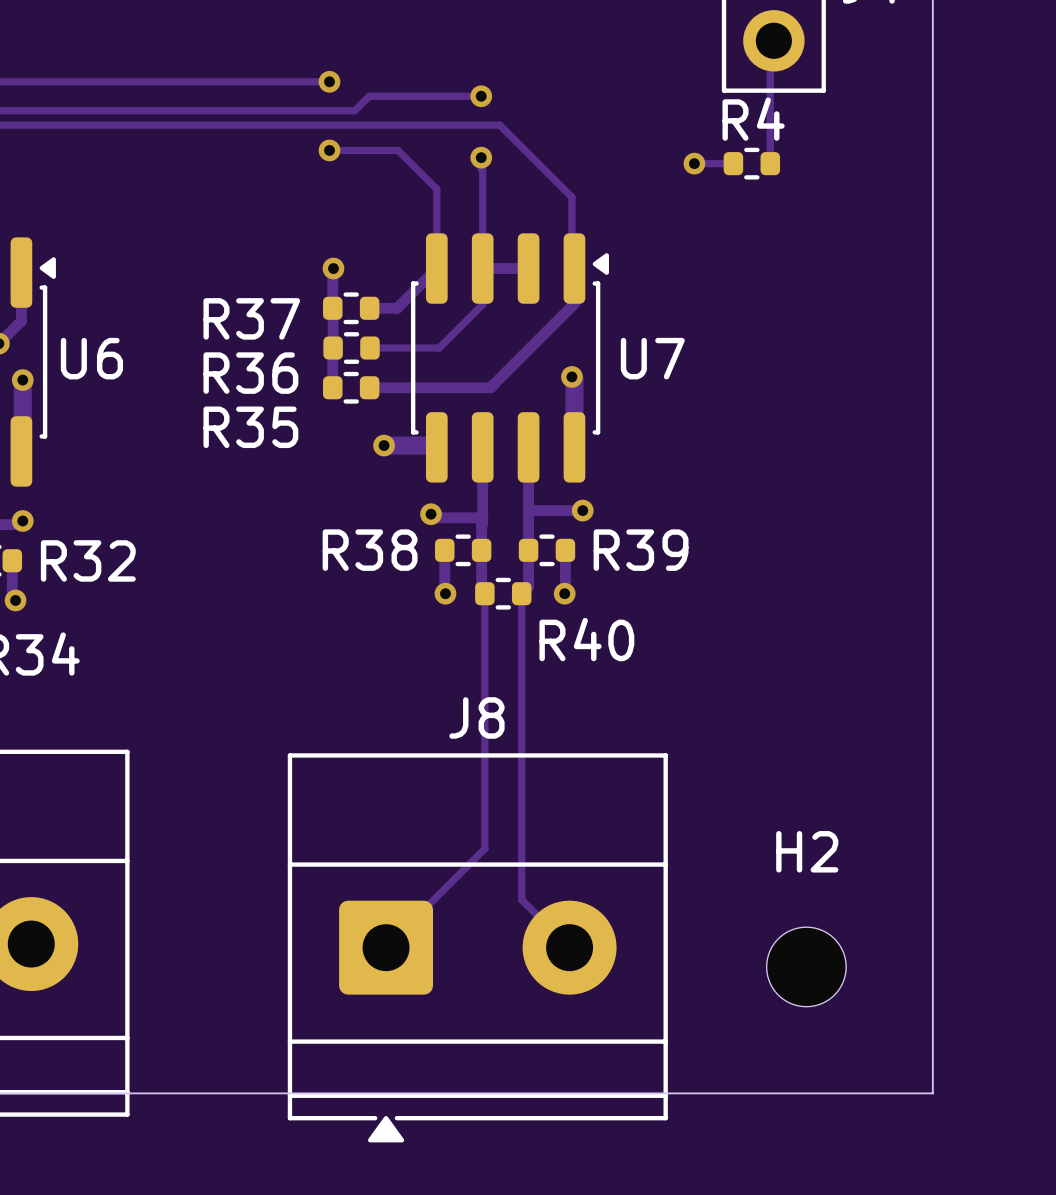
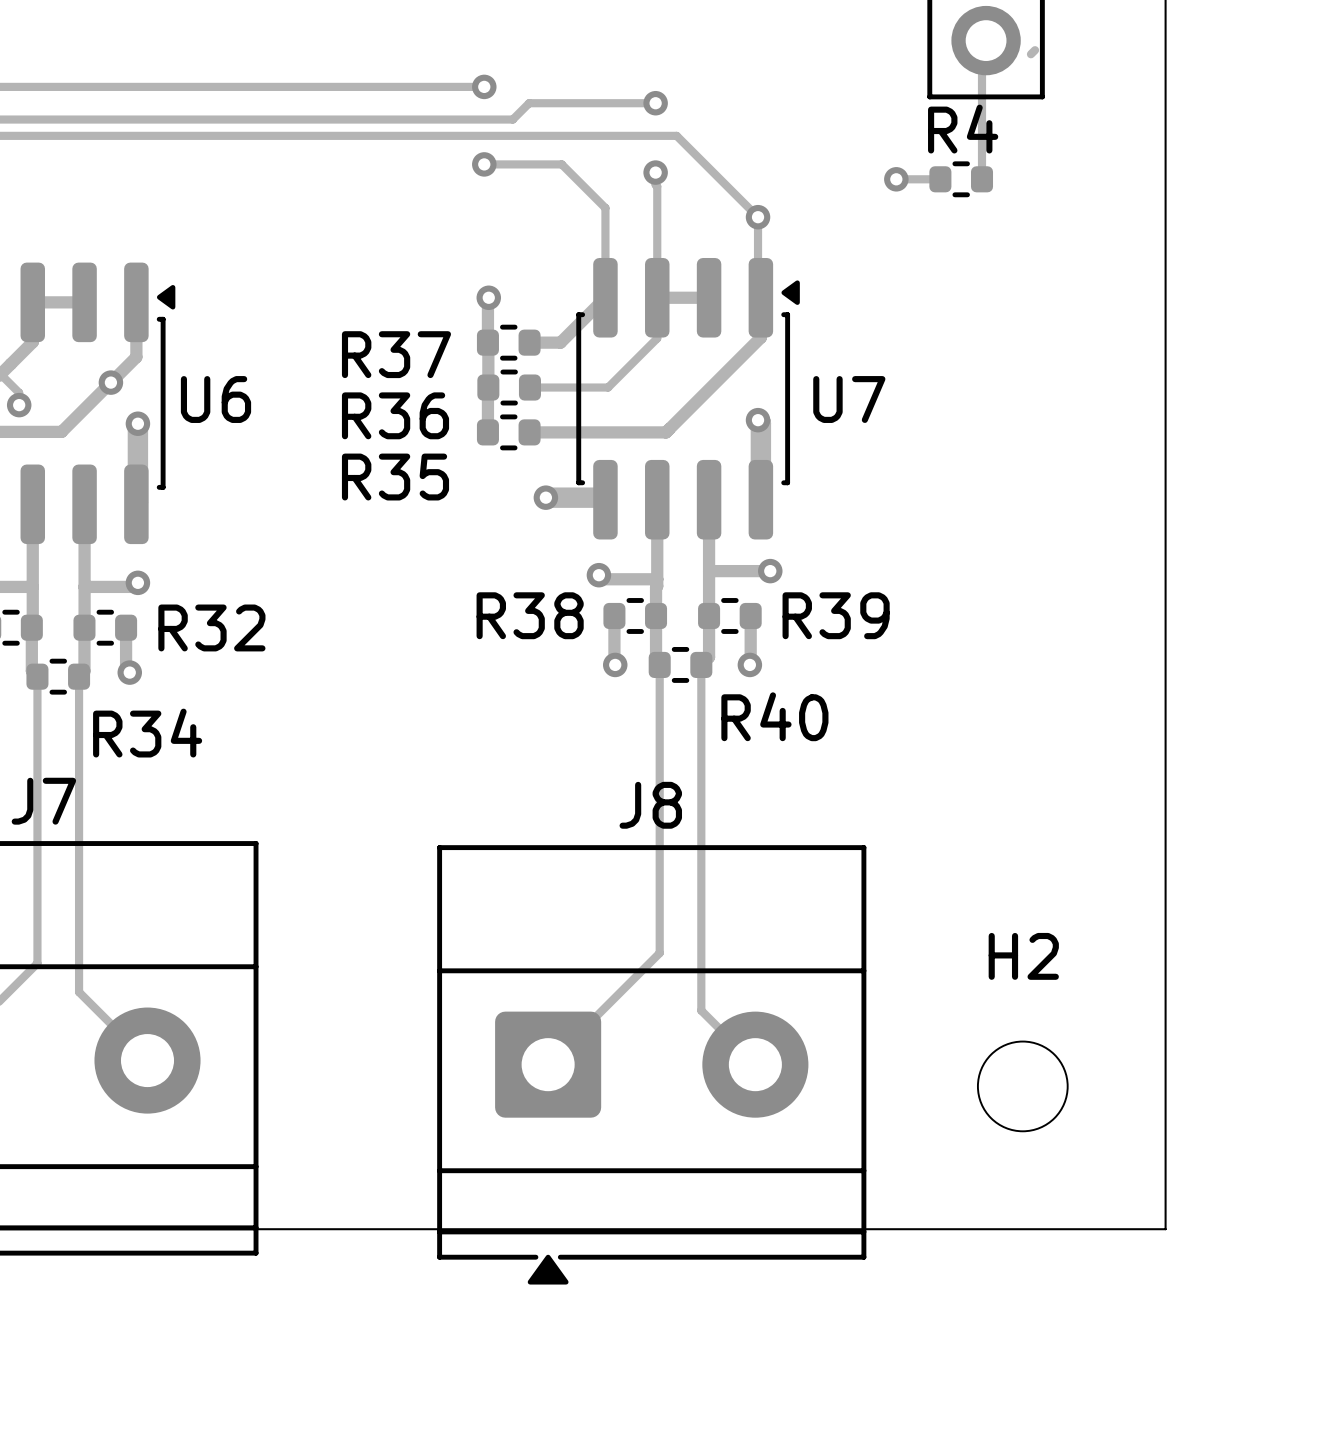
track: none -> (1035, 50) (1030, 54)
via: none -> (758, 217)

